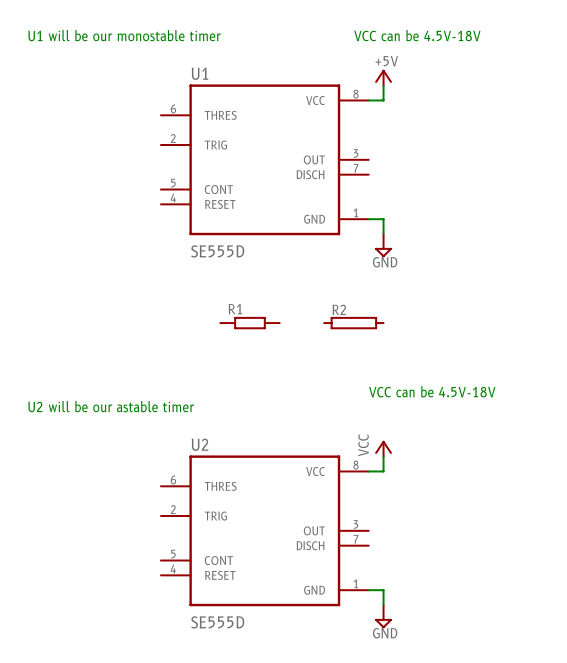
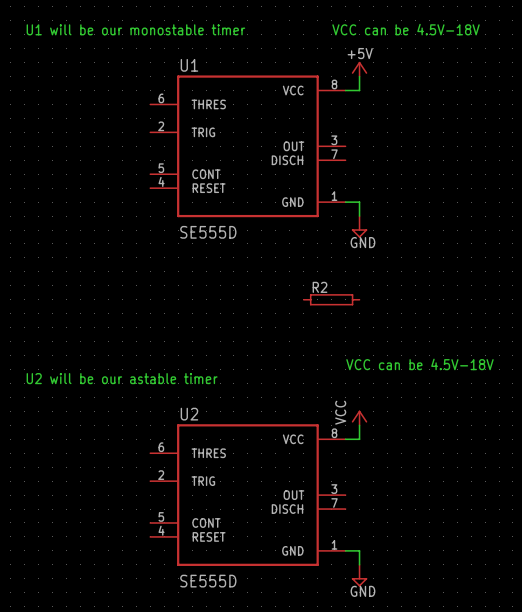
R1: (249, 323) -> none

